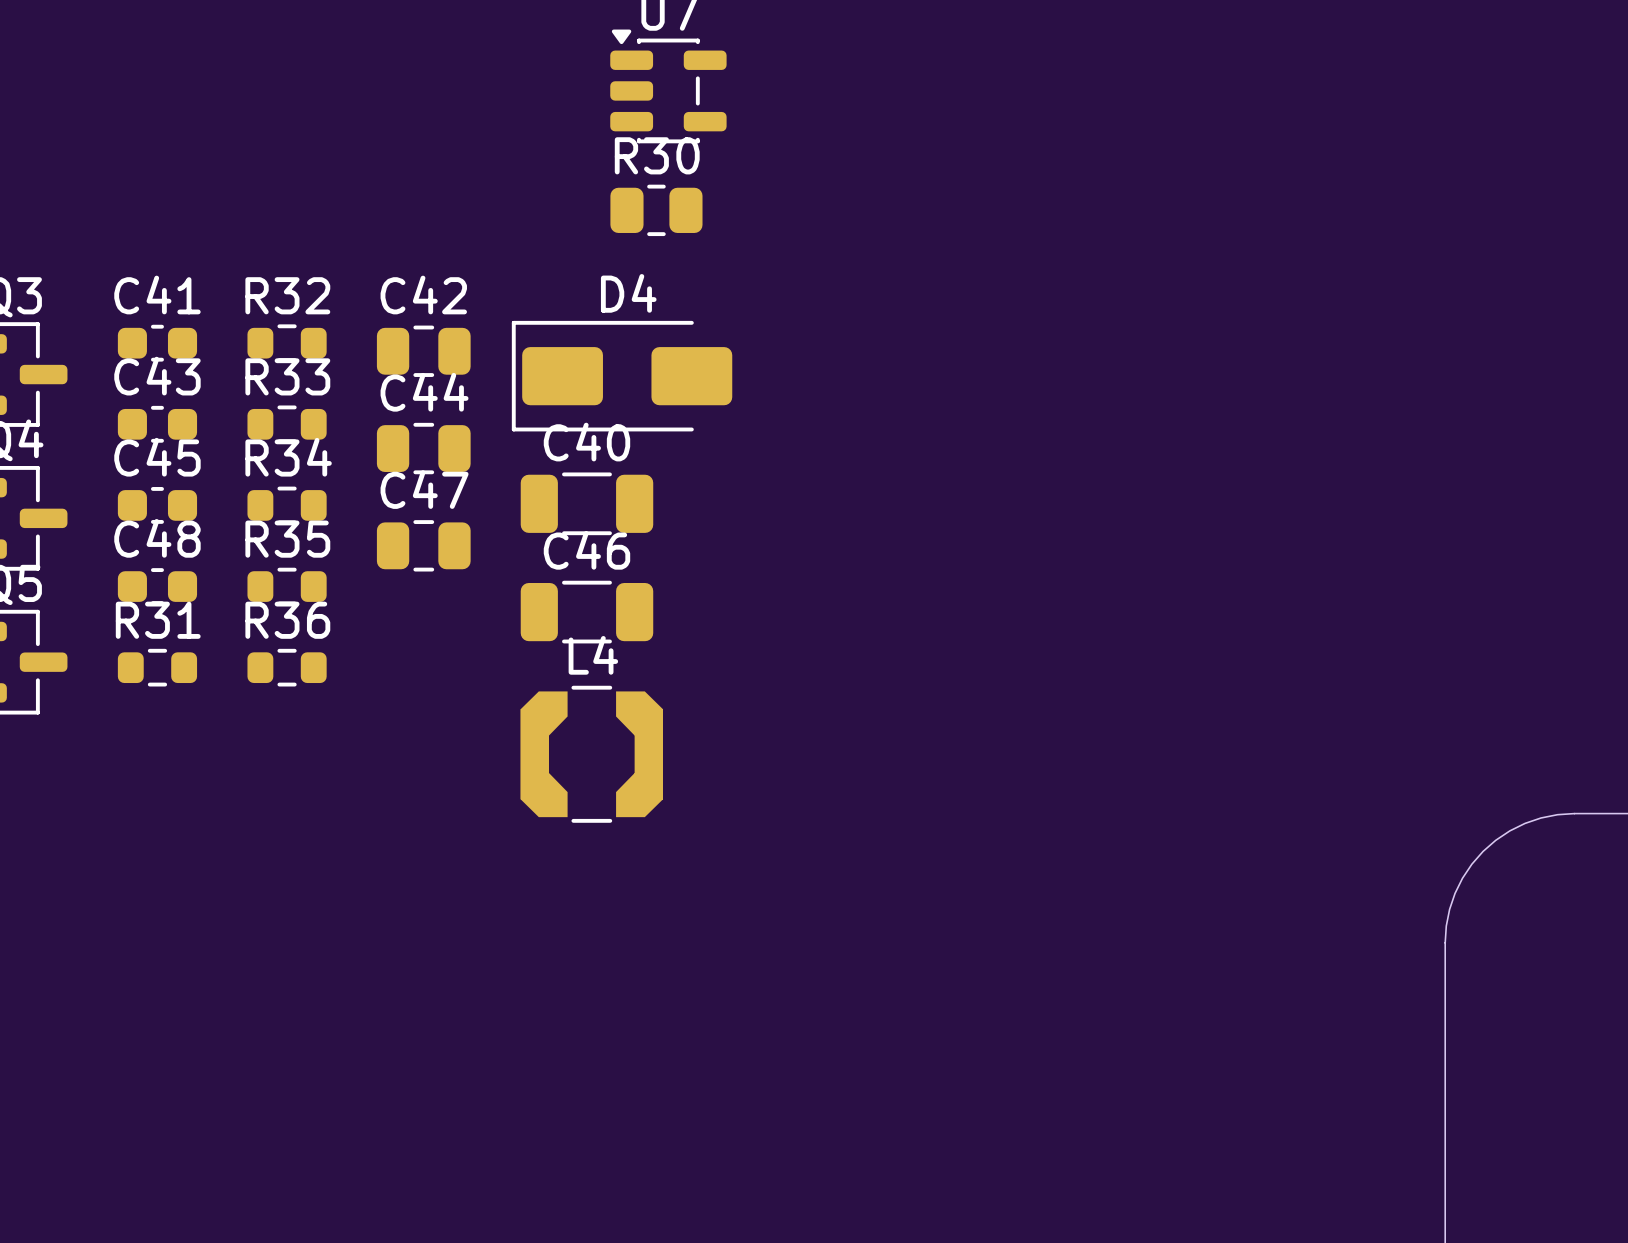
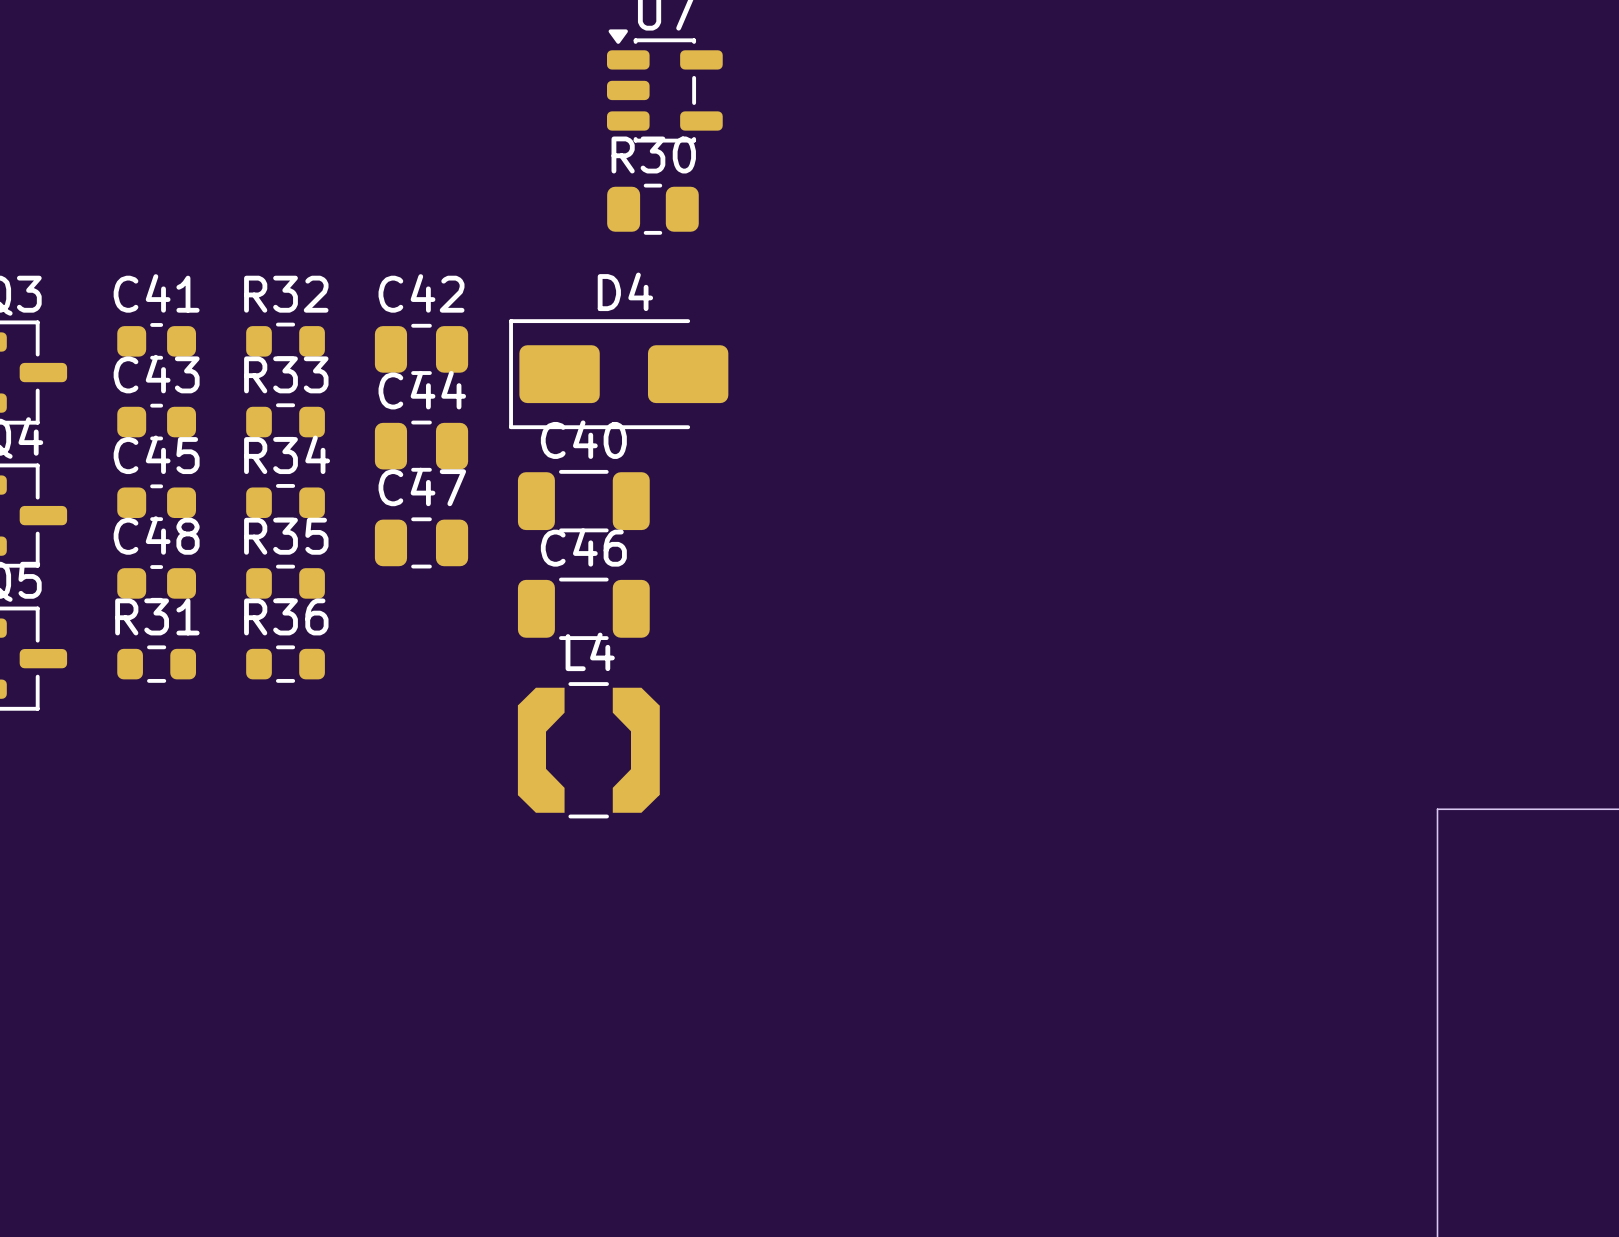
board edge: (1574, 813) (1557, 814) (1525, 823) (1495, 840) (1483, 851) (1462, 878) (1455, 893) (1446, 925) (1445, 942) -> (1566, 809) (1437, 809) (1437, 937)

